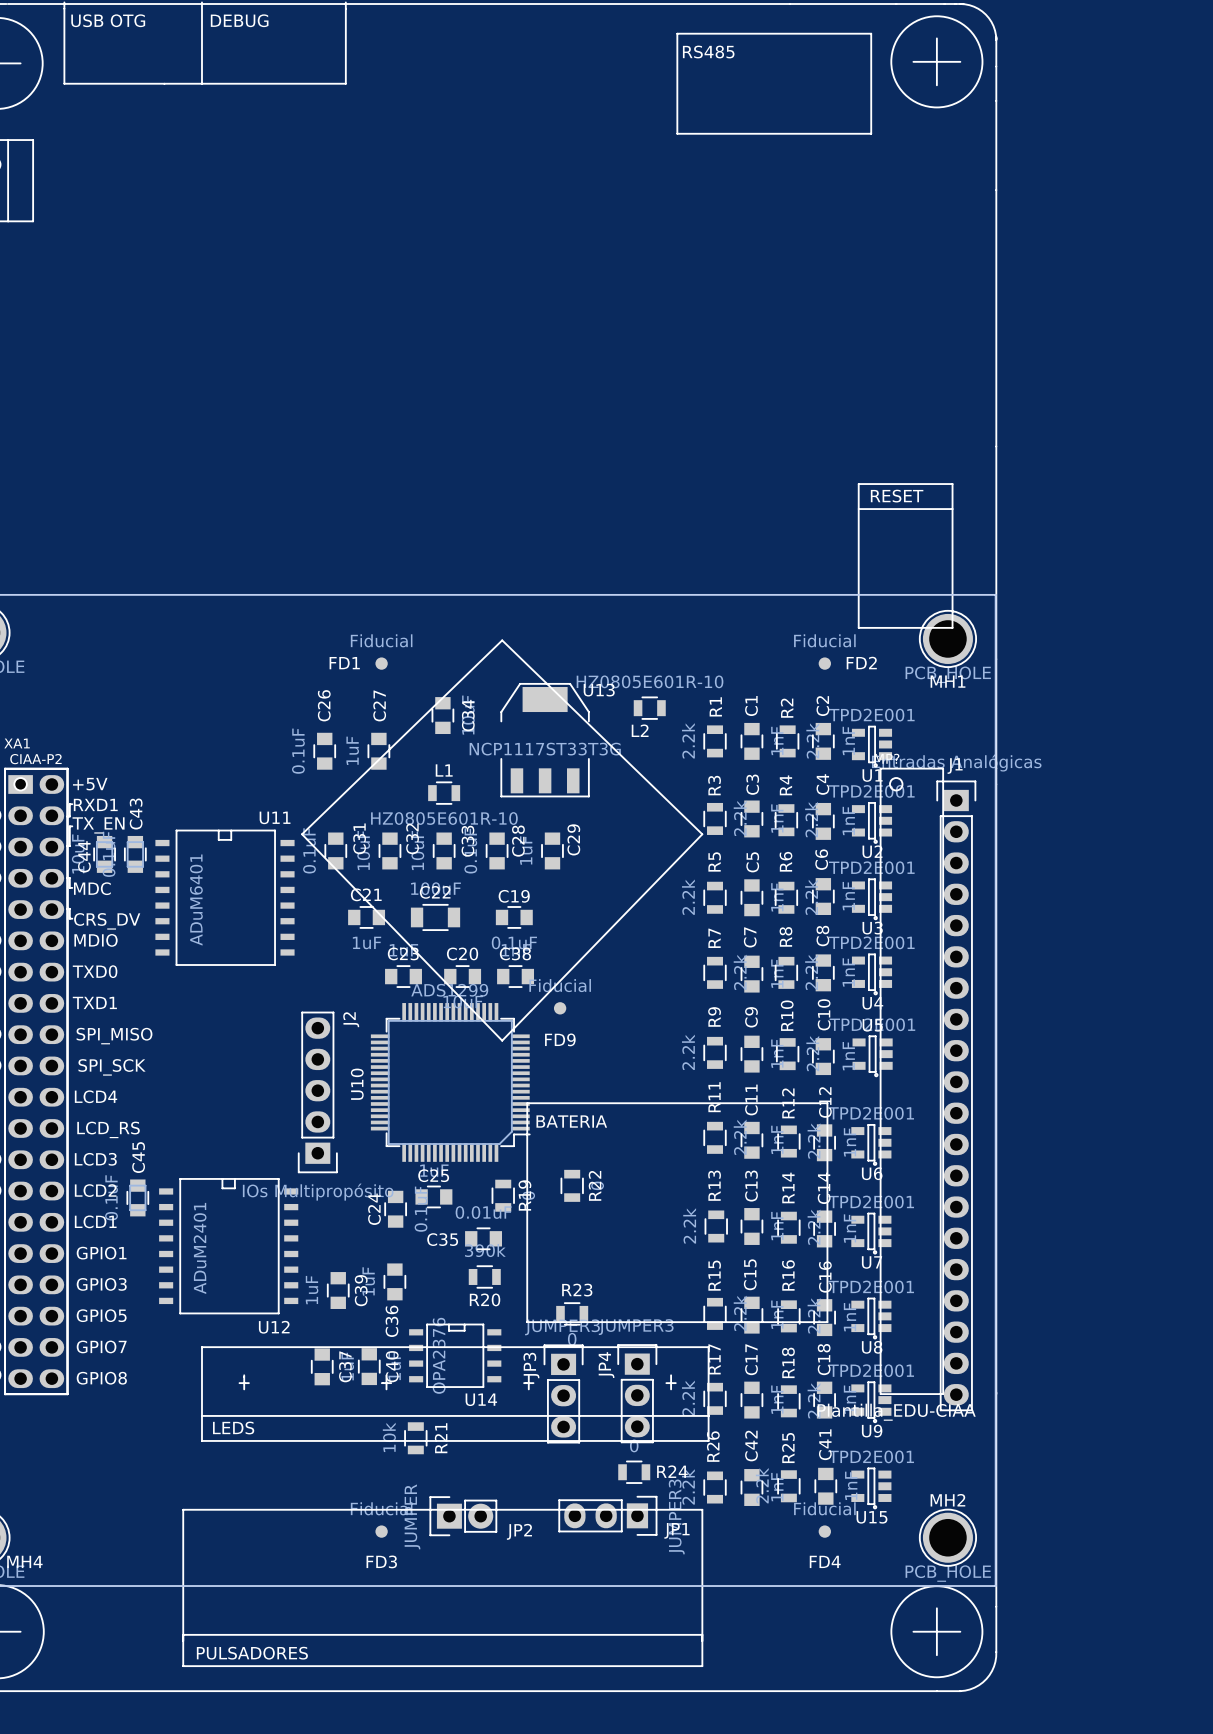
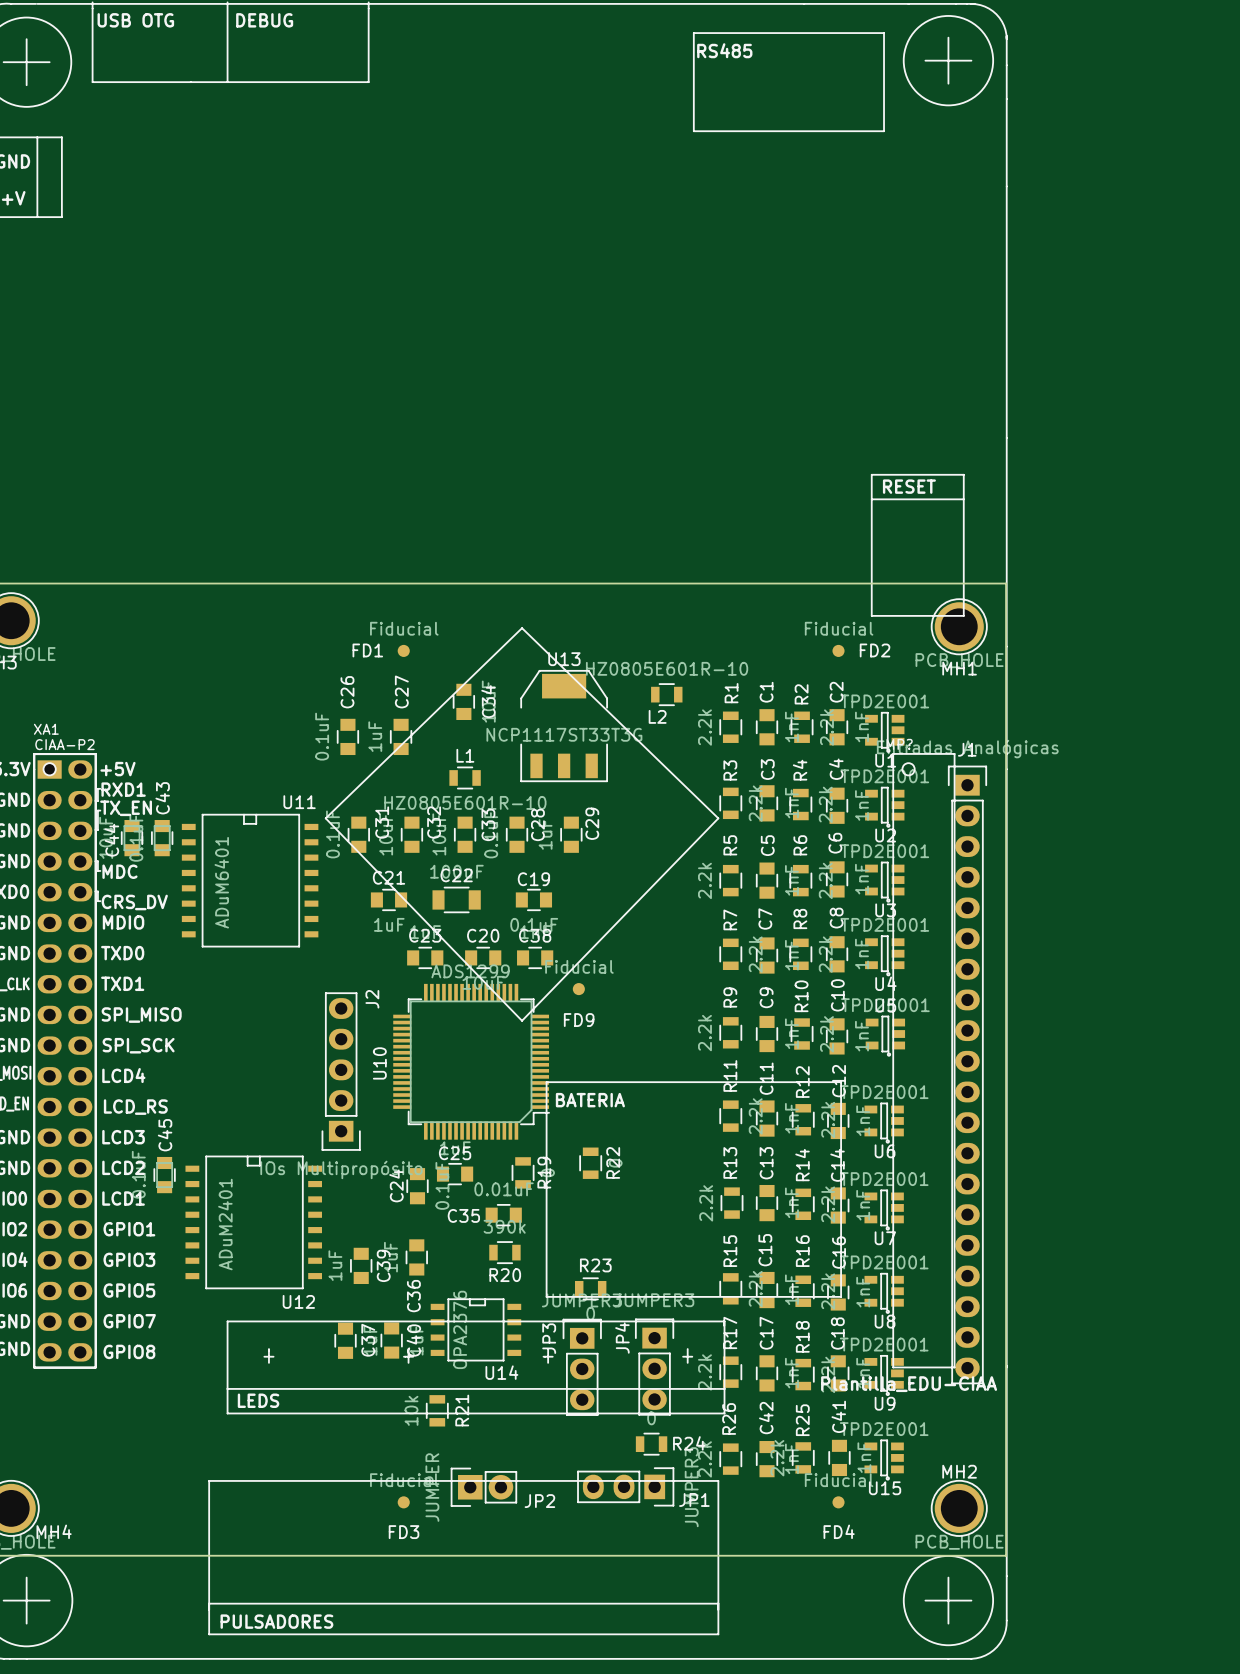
U13 name position: U13 (599, 690) -> U13 (564, 659)

